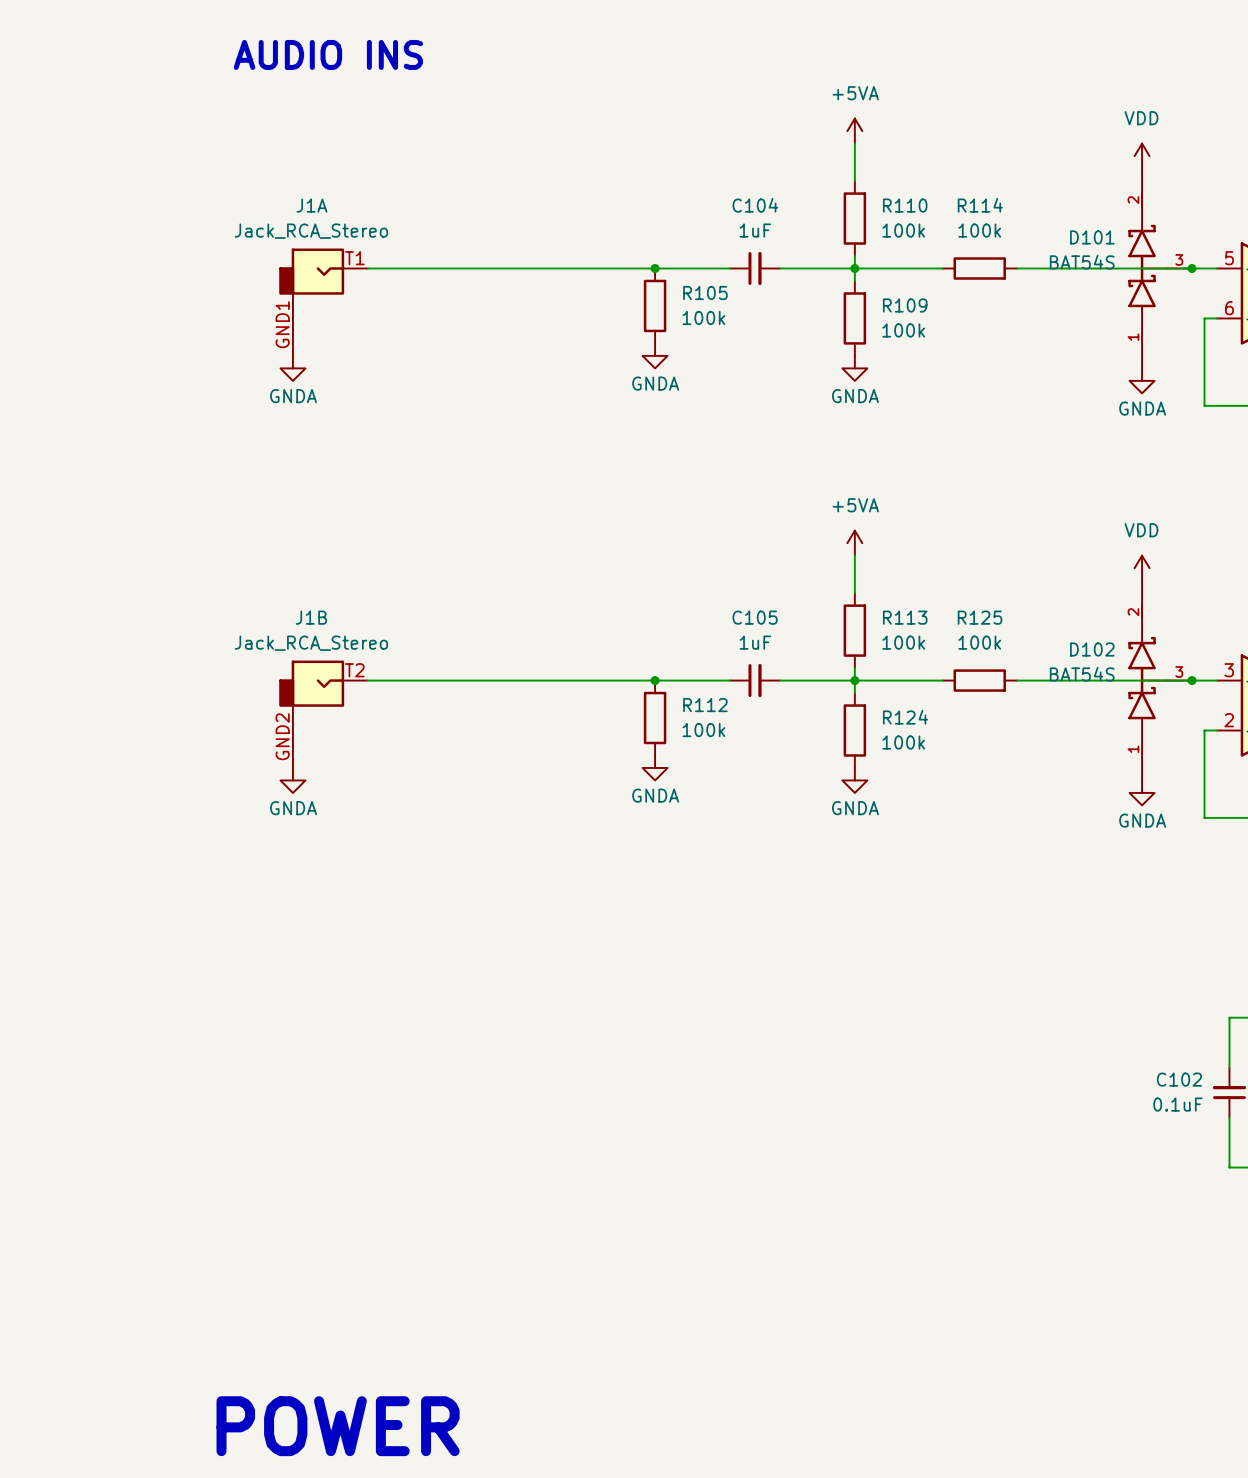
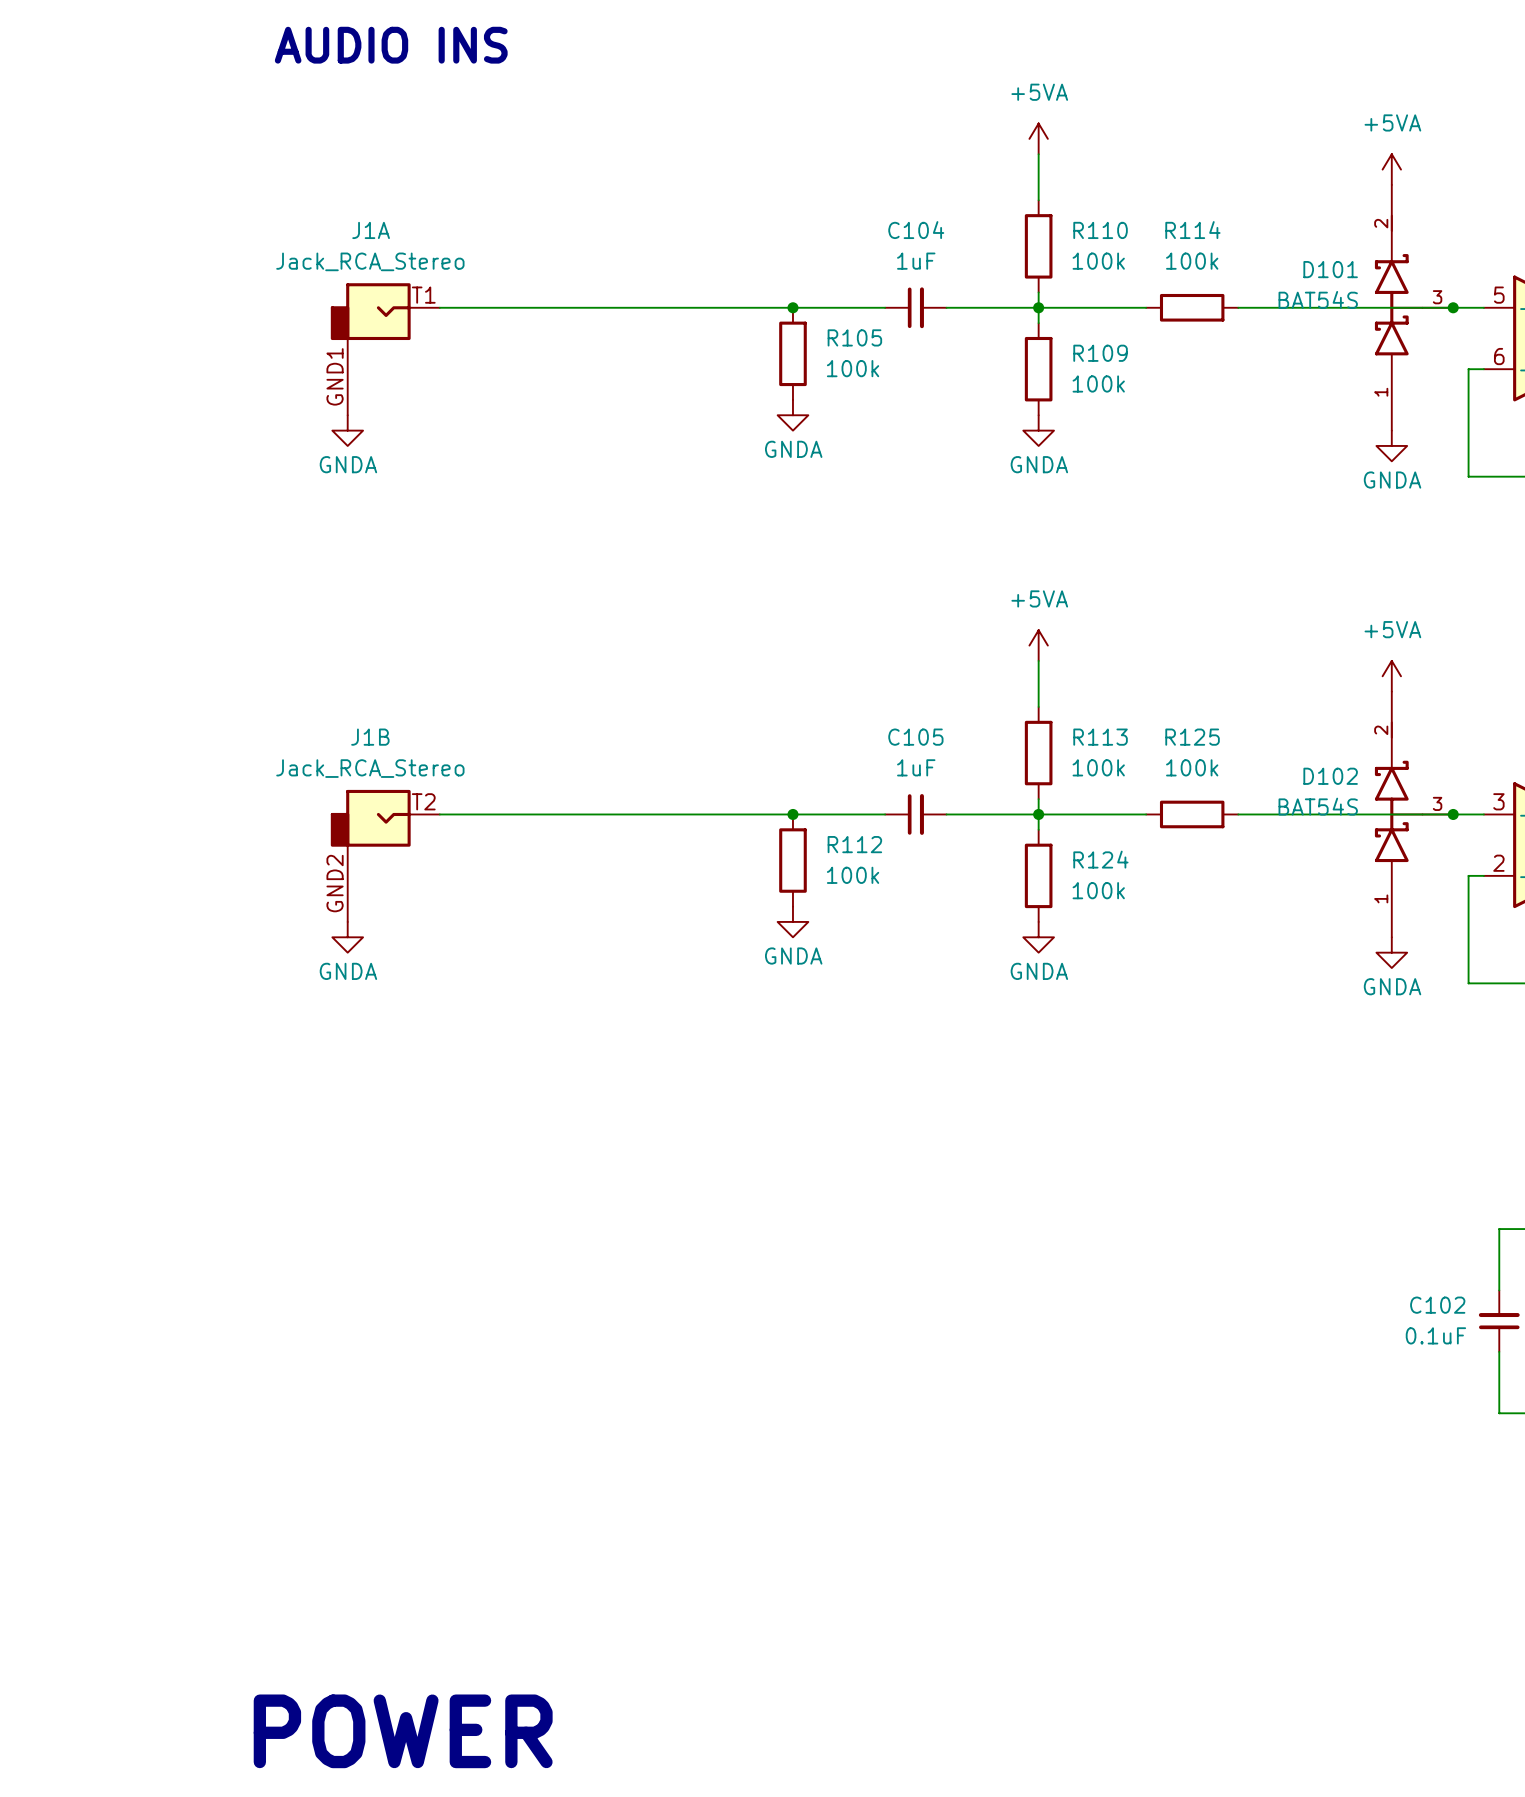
power symbol: VDD (1142, 156) -> +5VA (1391, 169)
power symbol: VDD (1142, 568) -> +5VA (1391, 676)

